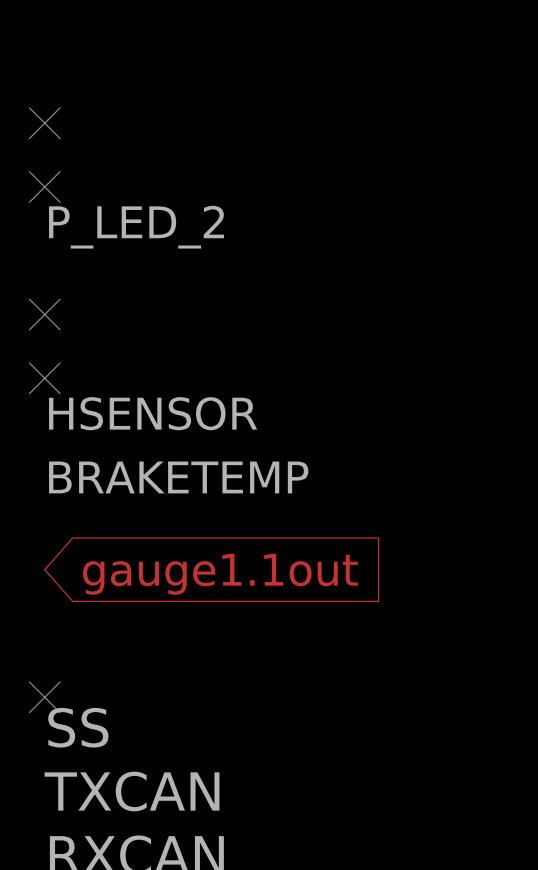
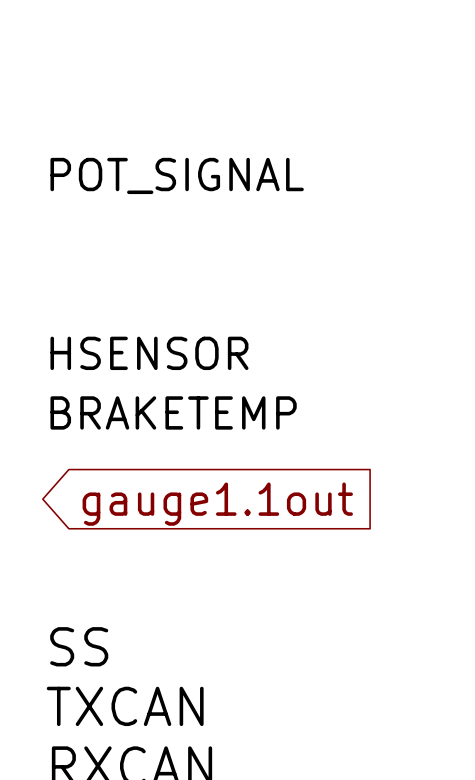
no-connect mark: (44, 123) -> none
no-connect mark: (44, 186) -> none
label: P_LED_2 (136, 227) -> POT_SIGNAL (177, 175)
no-connect mark: (44, 314) -> none
no-connect mark: (44, 378) -> none
no-connect mark: (44, 697) -> none

